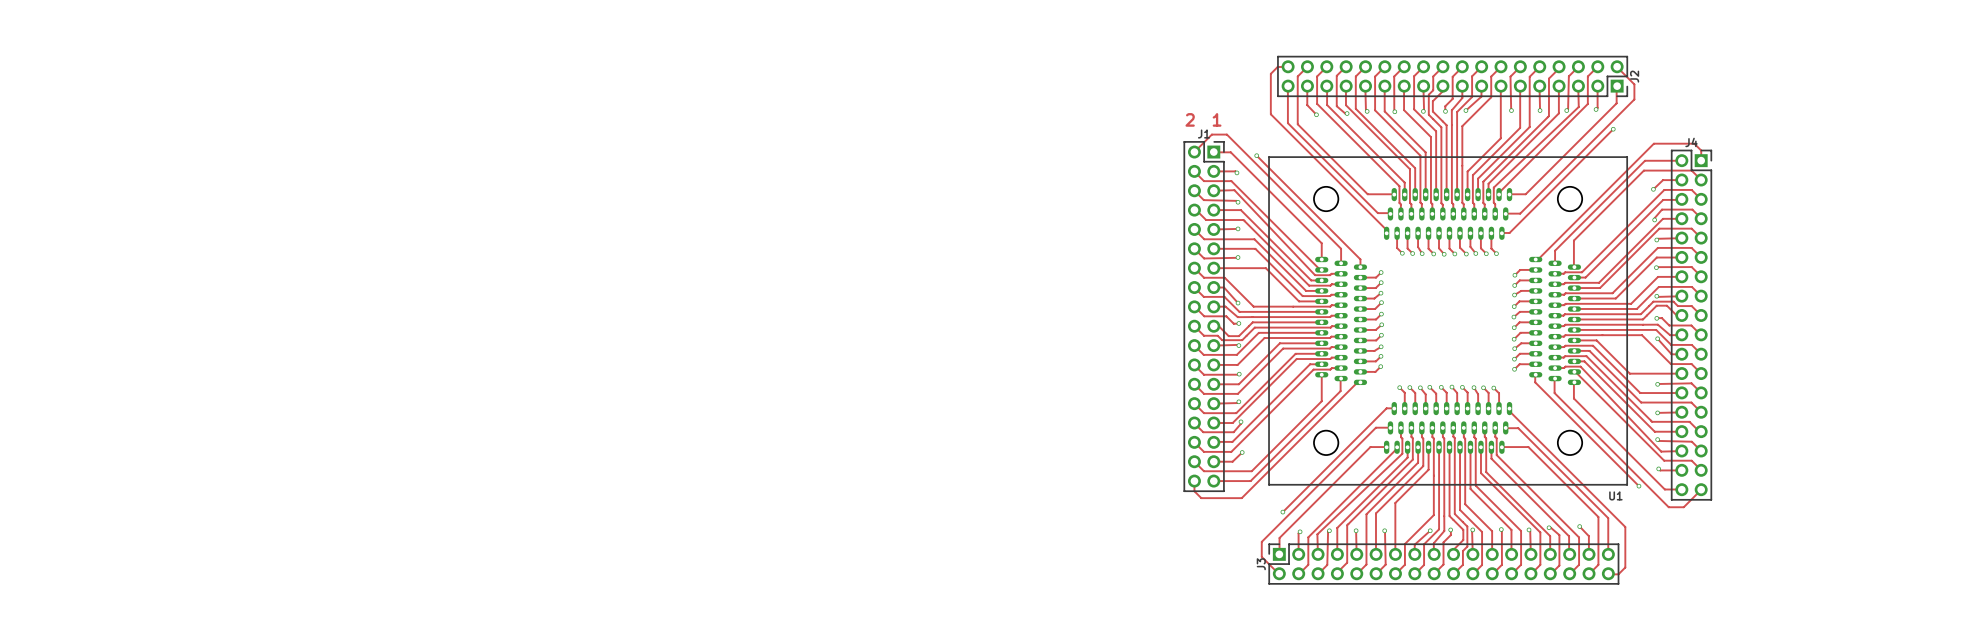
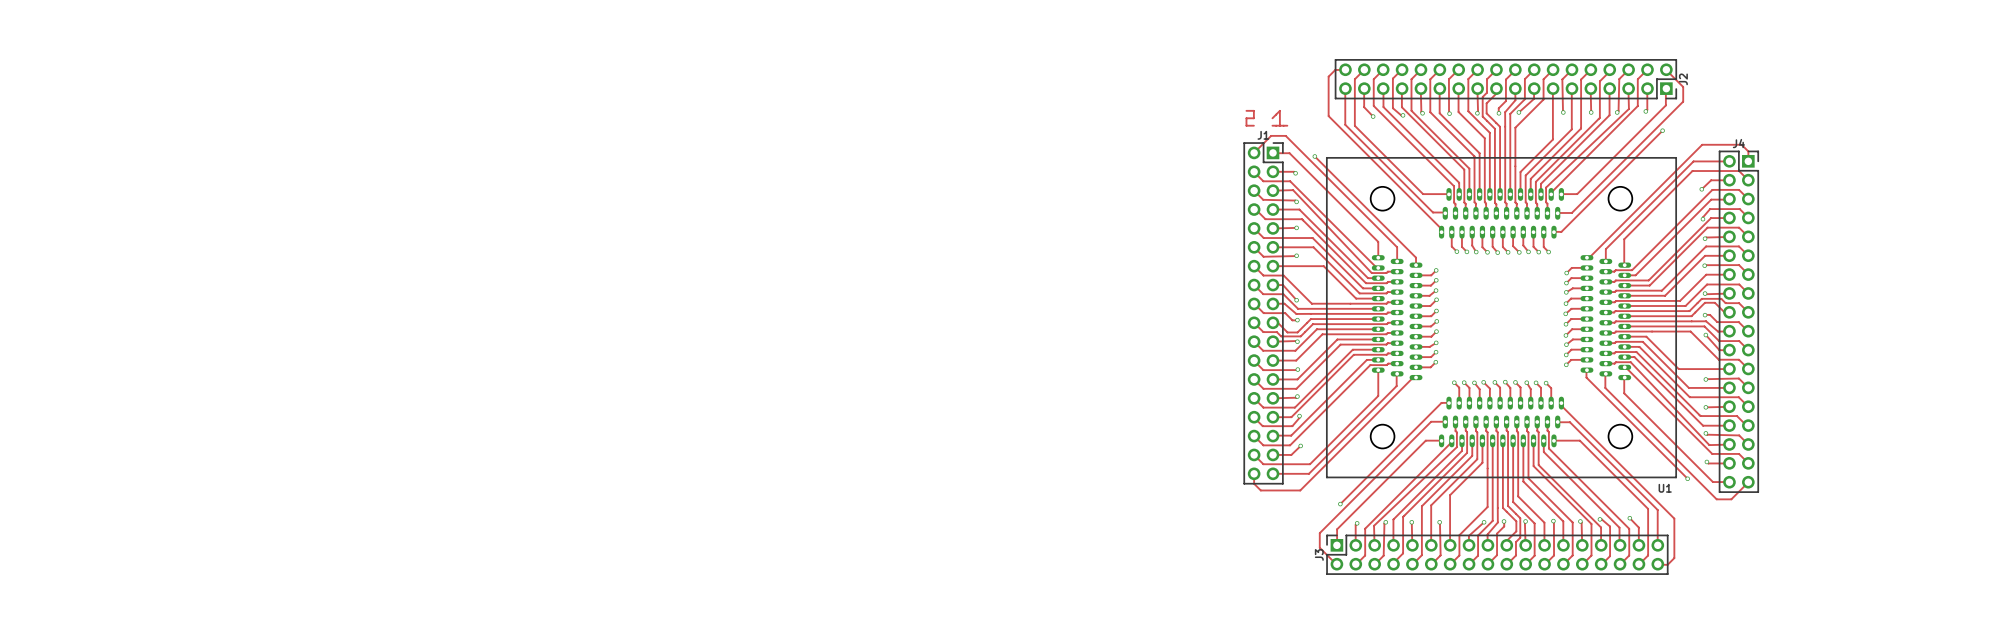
track: none -> (1246, 110) (1253, 110) (1253, 118) (1246, 118) (1246, 125) (1253, 125)
track: none -> (1272, 118) (1279, 110) (1279, 125)
text: 2 (1190, 119) -> none
text: 1 (1217, 119) -> none
track: none -> (1272, 125) (1287, 125)

